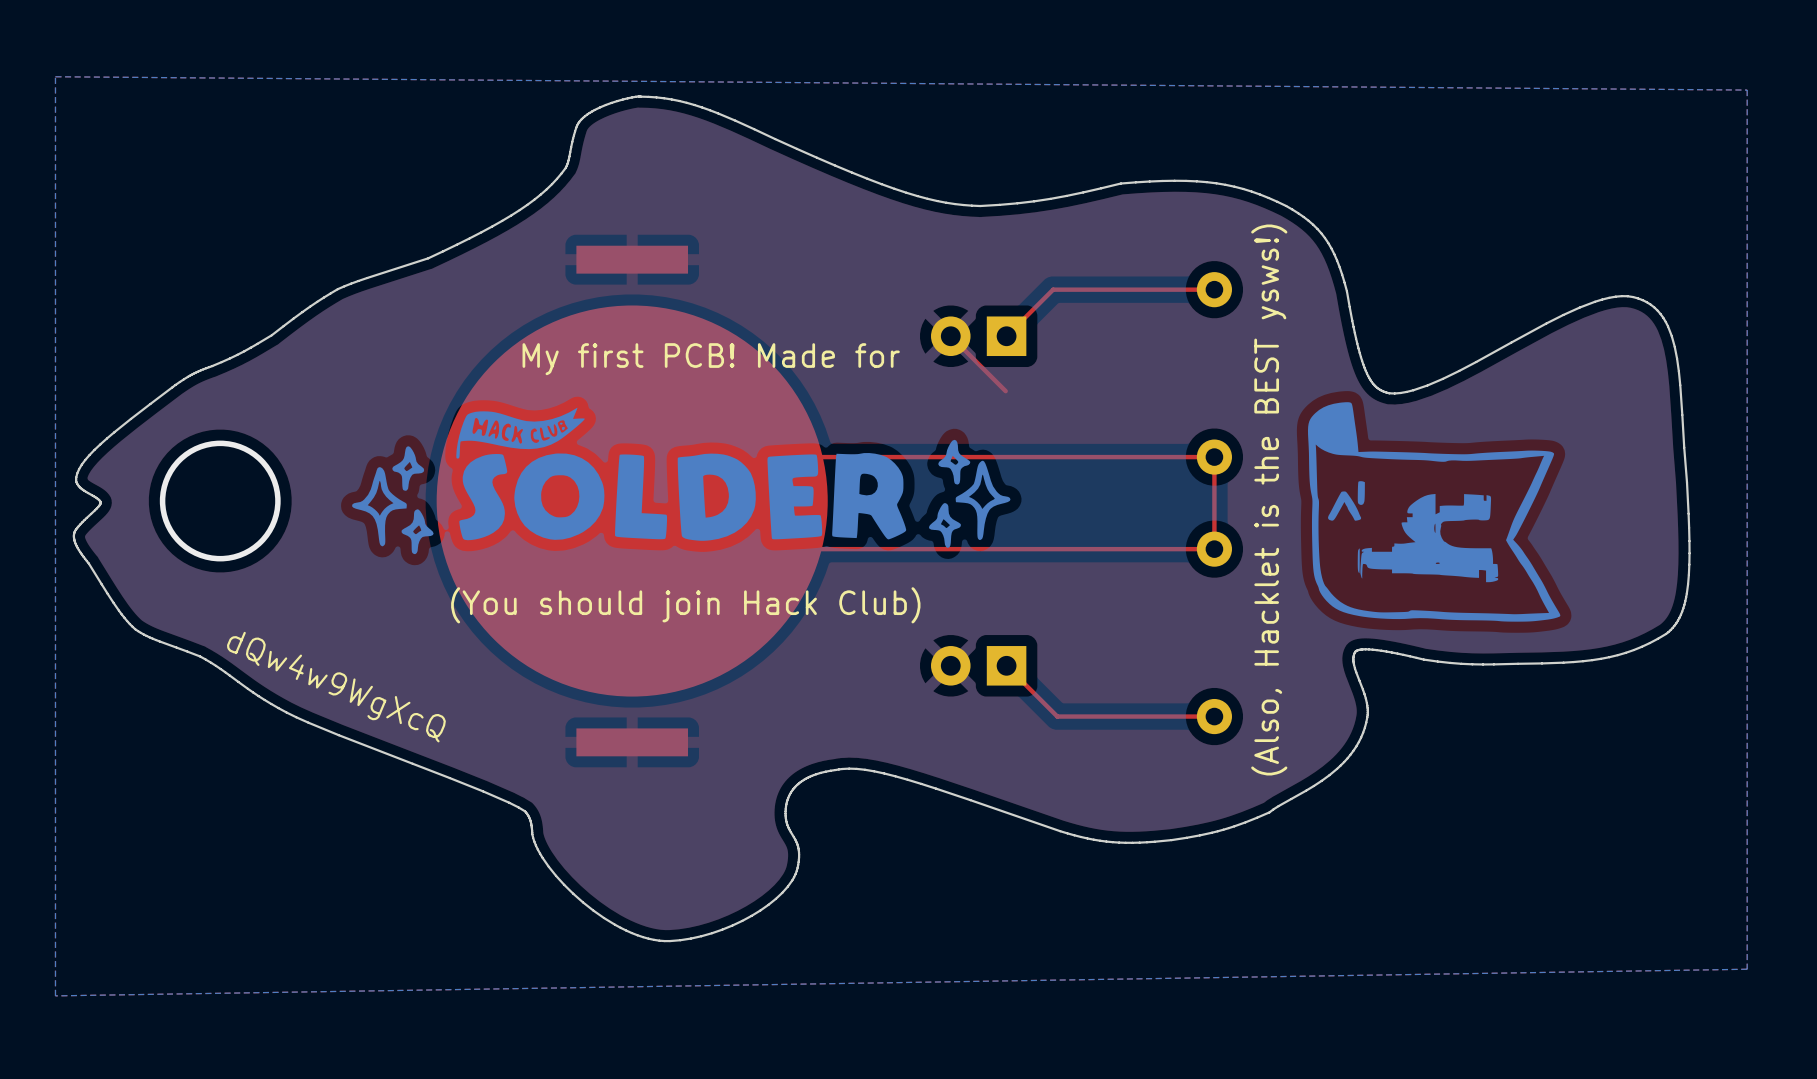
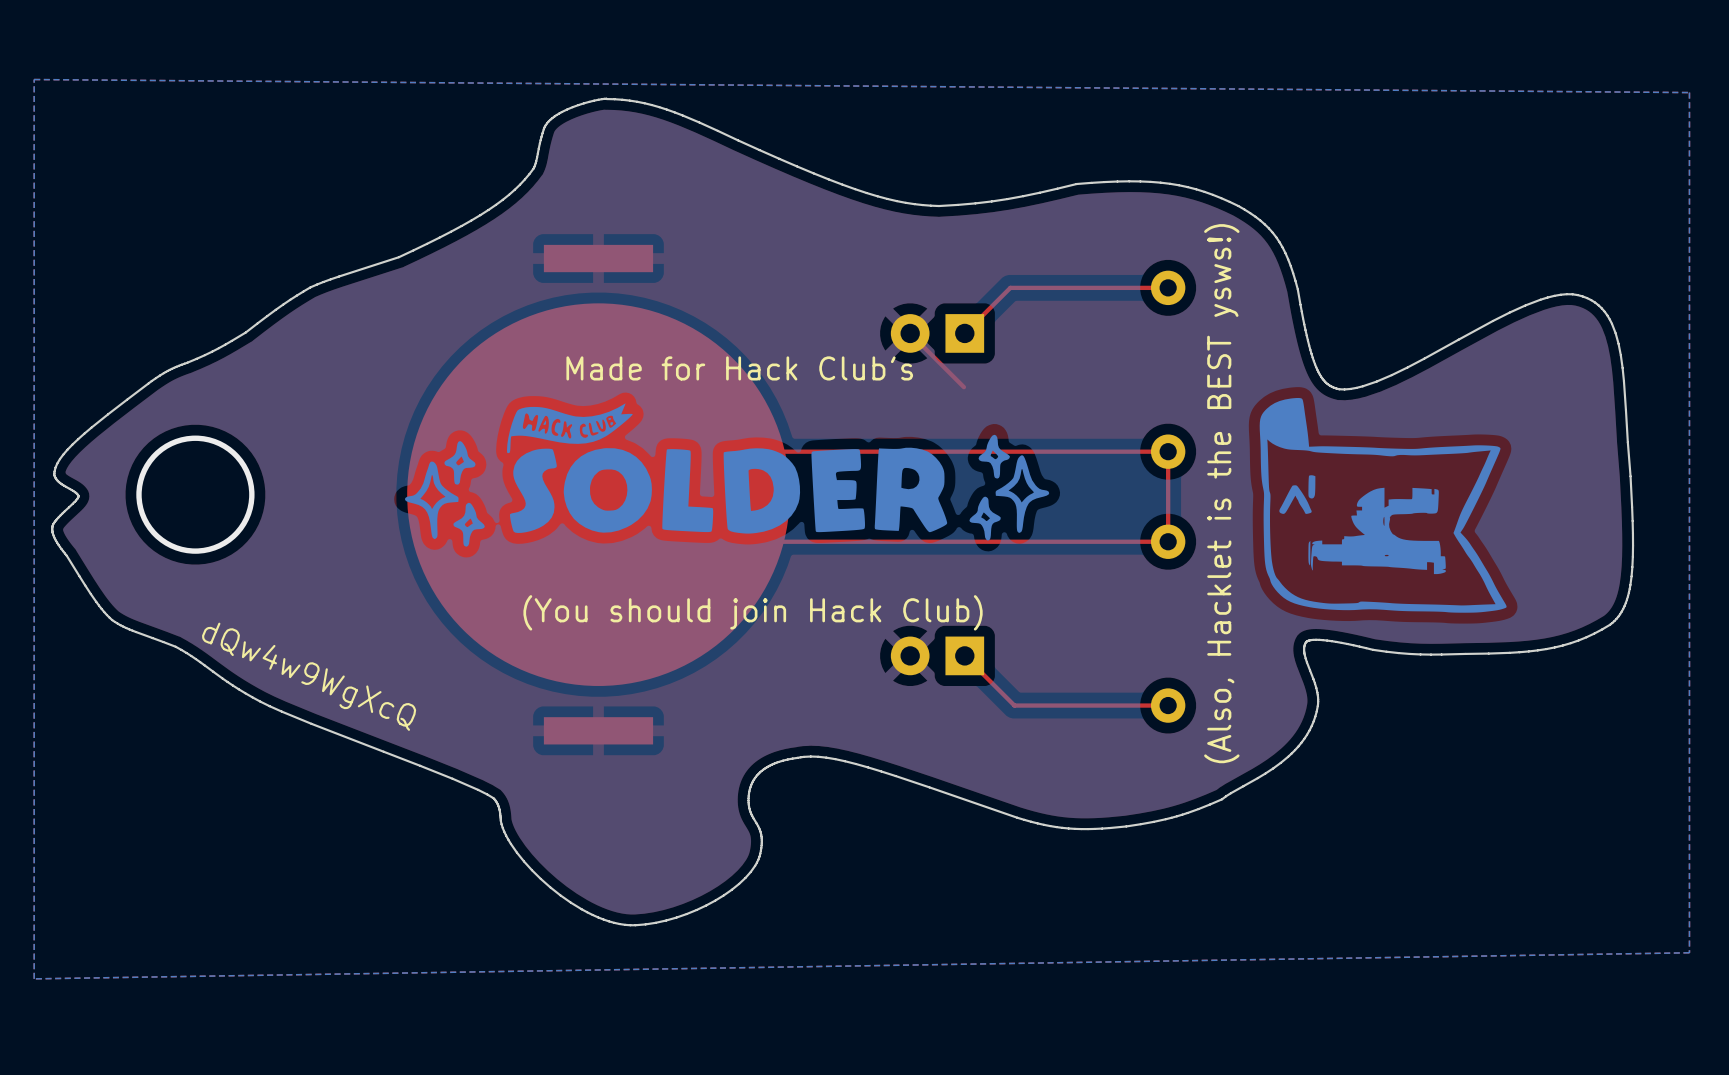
text: My first PCB! Made for (711, 359) -> none
text: none -> Made for Hack Club's (739, 368)
drawing position: (681, 480) -> (727, 475)
text position: (You should join Hack Club) (685, 605) -> (You should join Hack Club) (753, 612)

